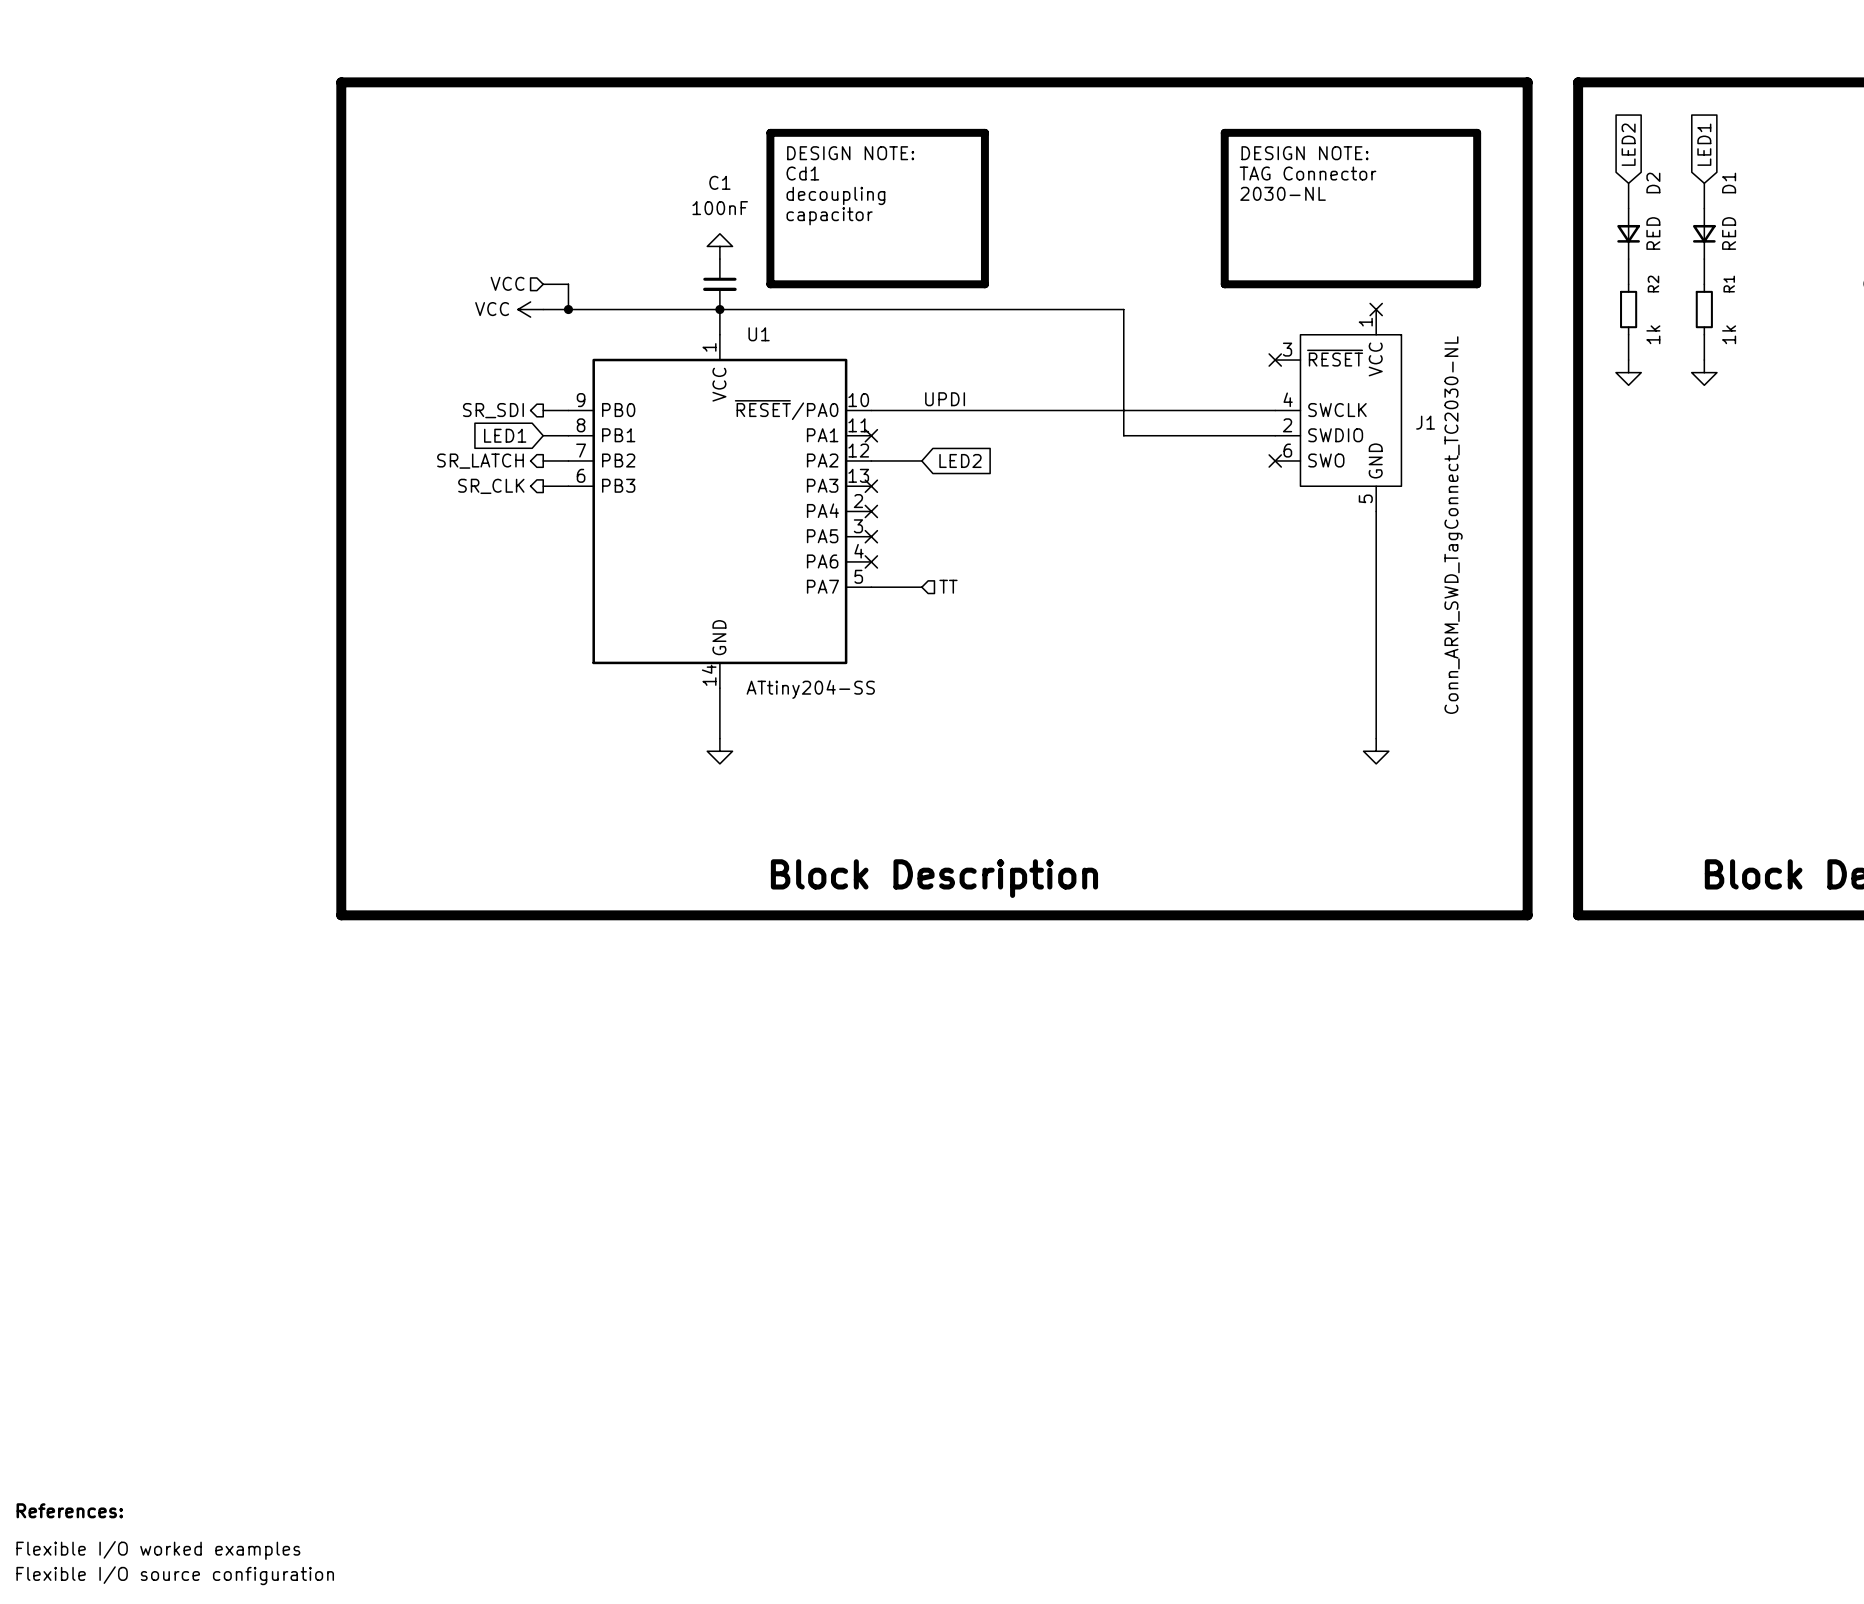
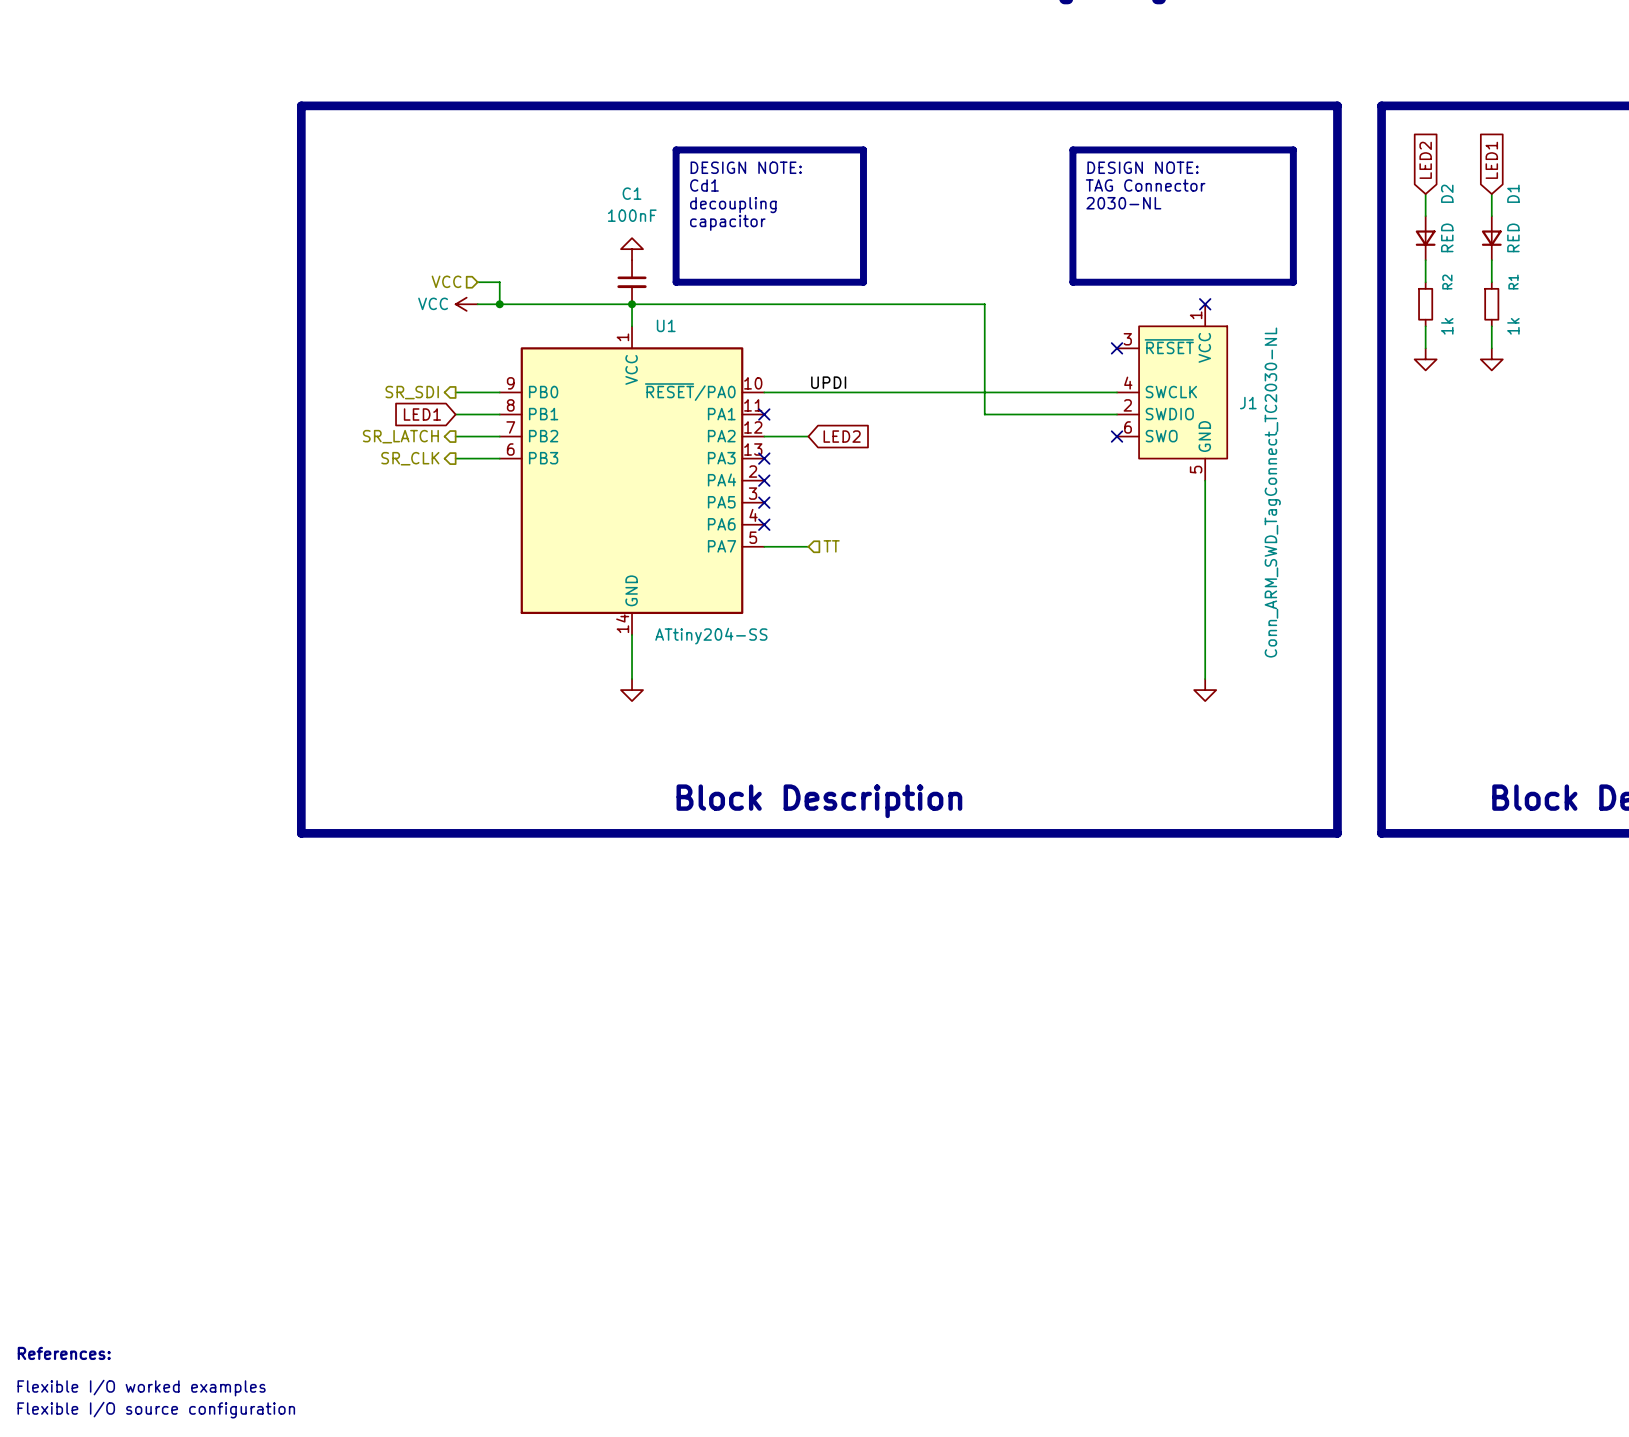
hierarchical label position: SR_SDI (493, 410) -> SR_SDI (412, 392)
wire: none -> (455, 392) (477, 392)
global label position: LED1 (505, 435) -> LED1 (422, 414)
wire: none -> (455, 414) (477, 414)
wire: none -> (455, 436) (477, 436)
hierarchical label position: SR_LATCH (480, 461) -> SR_LATCH (400, 436)
hierarchical label position: SR_CLK (491, 486) -> SR_CLK (410, 458)
wire: none -> (455, 458) (477, 458)

